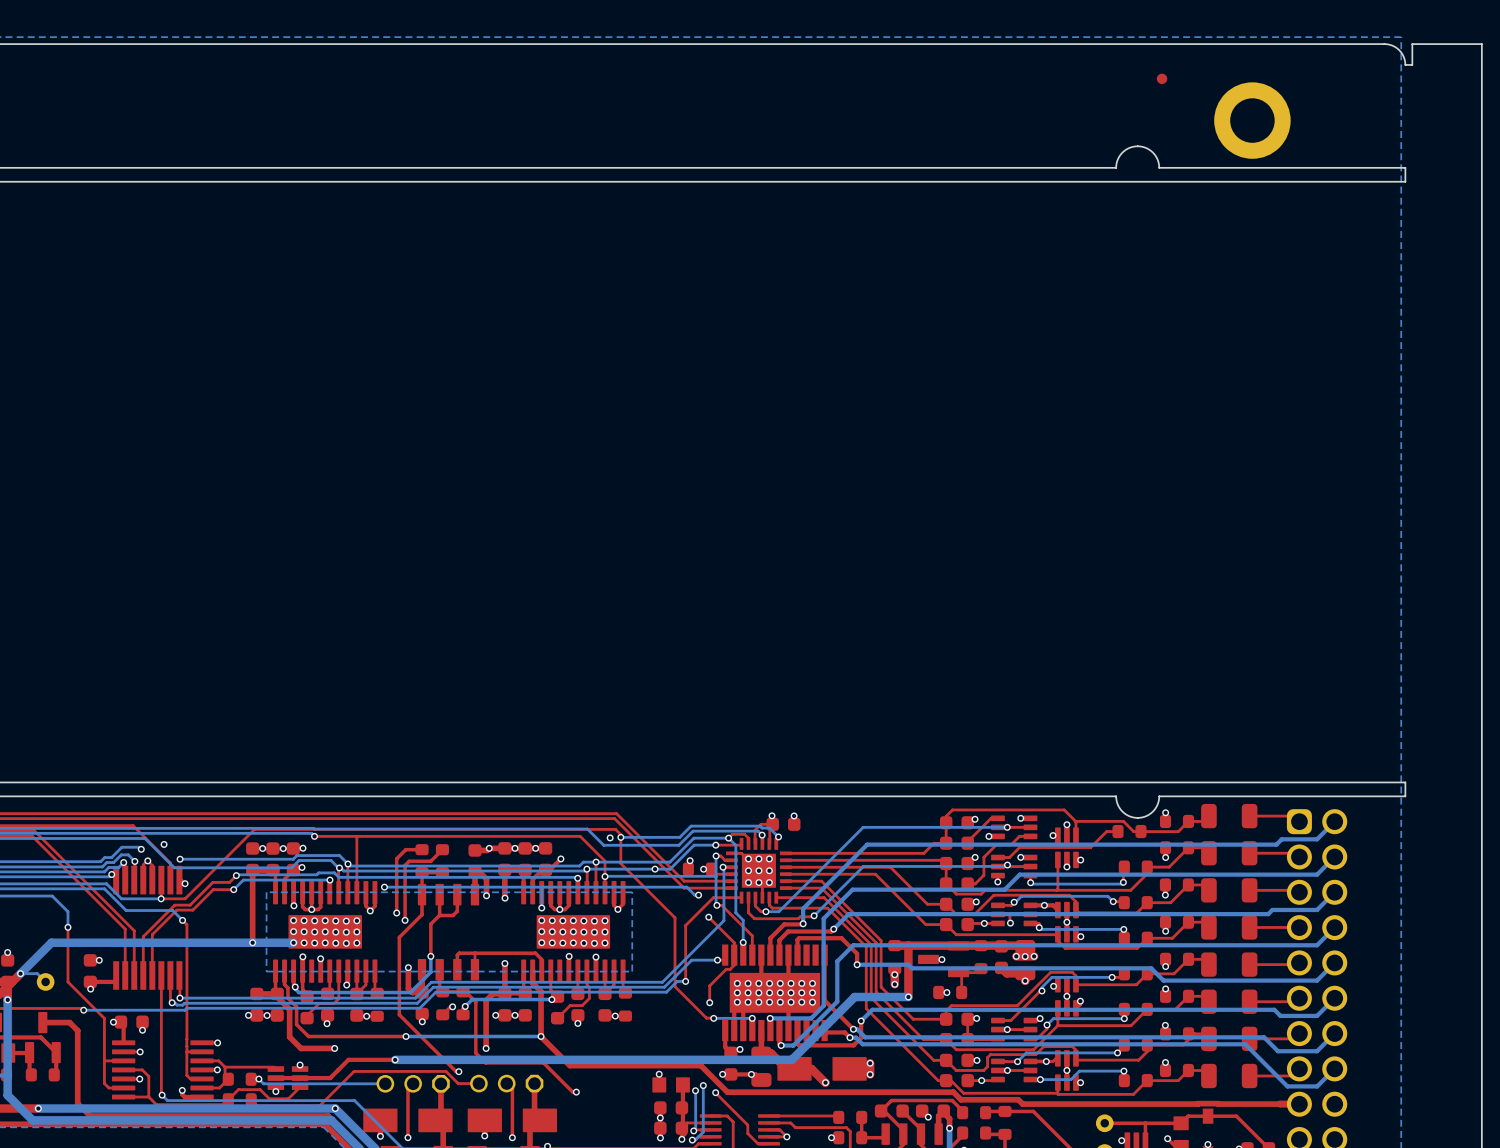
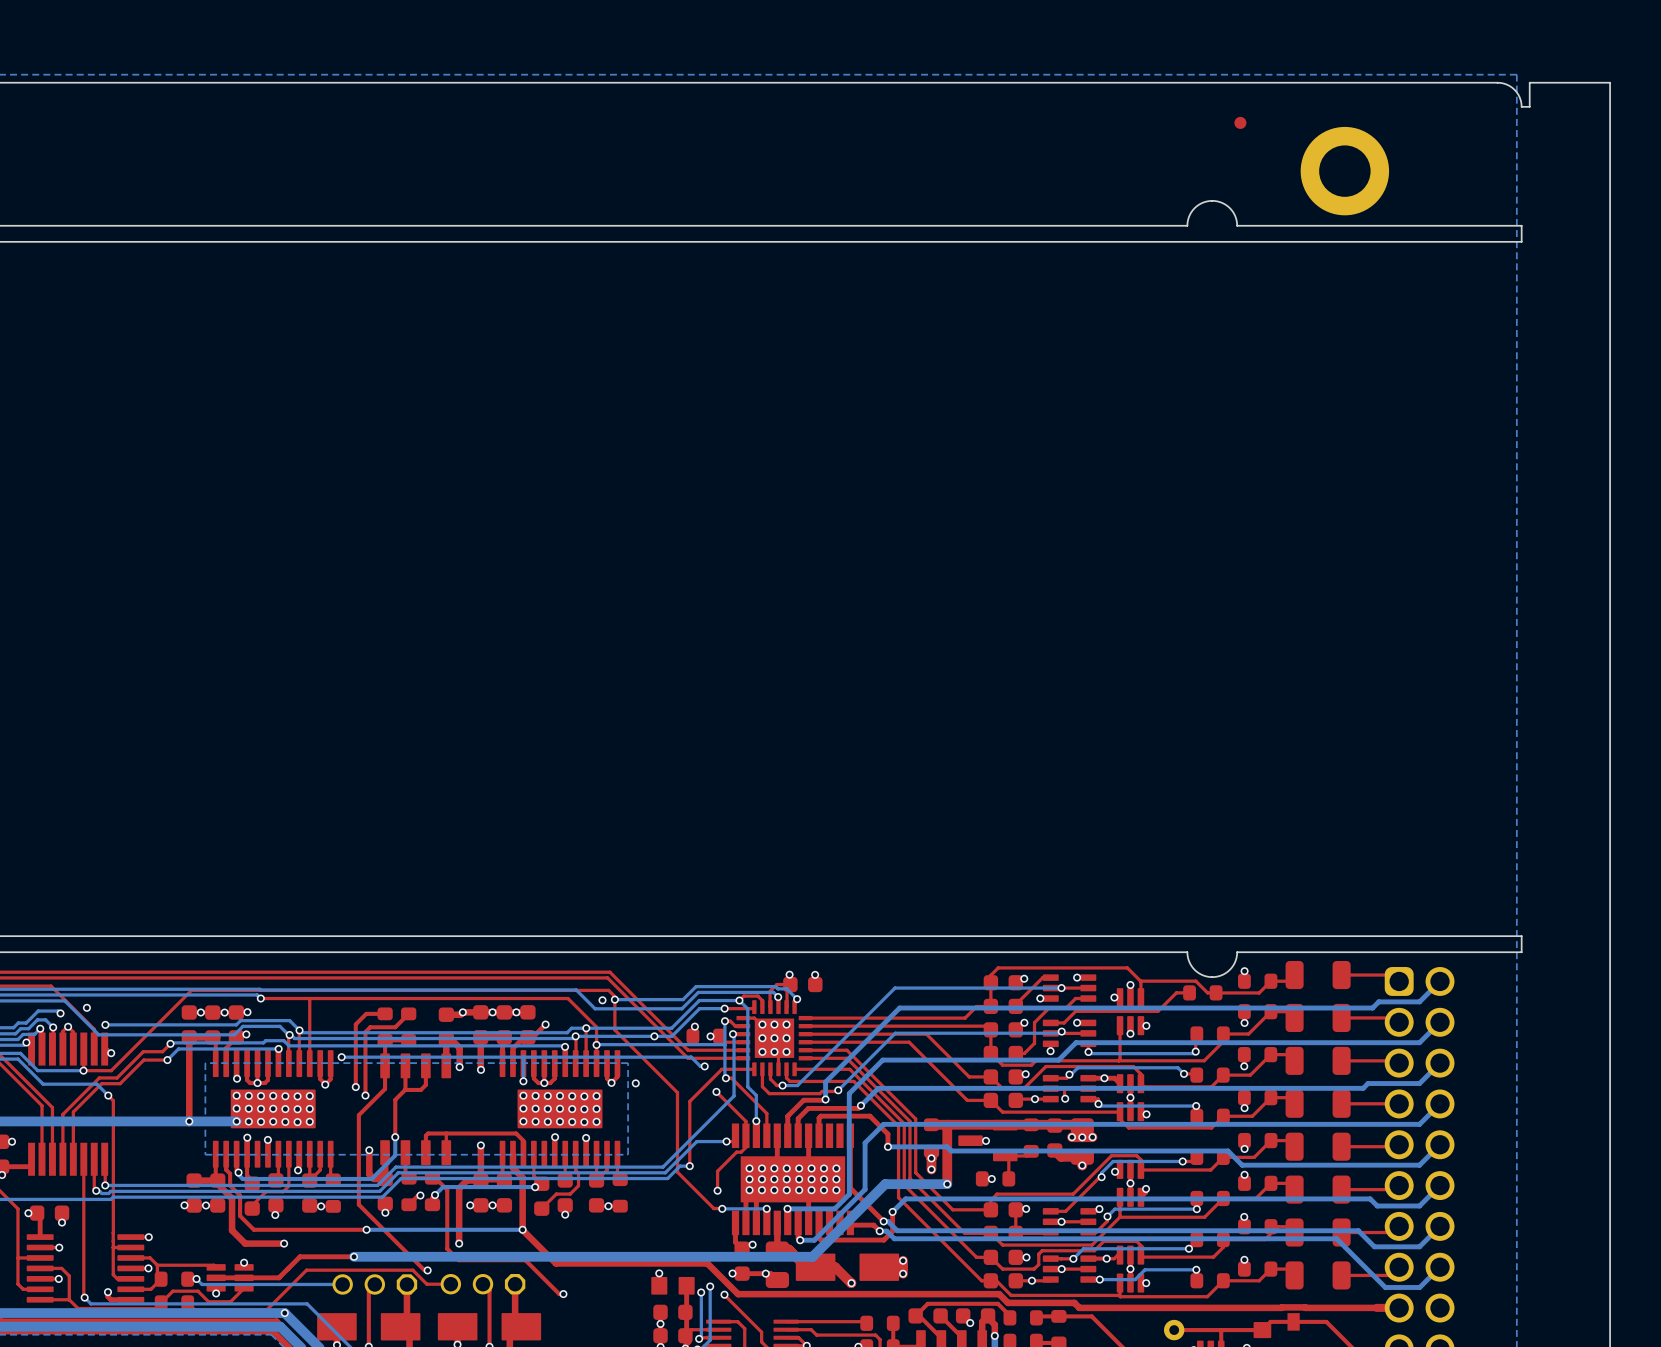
via: none -> (635, 1083)

